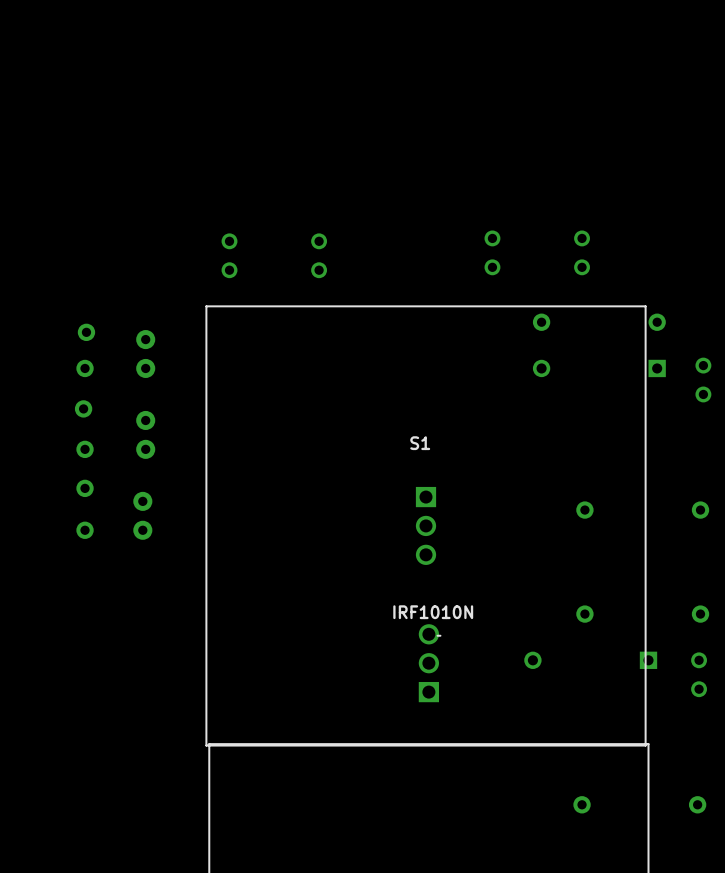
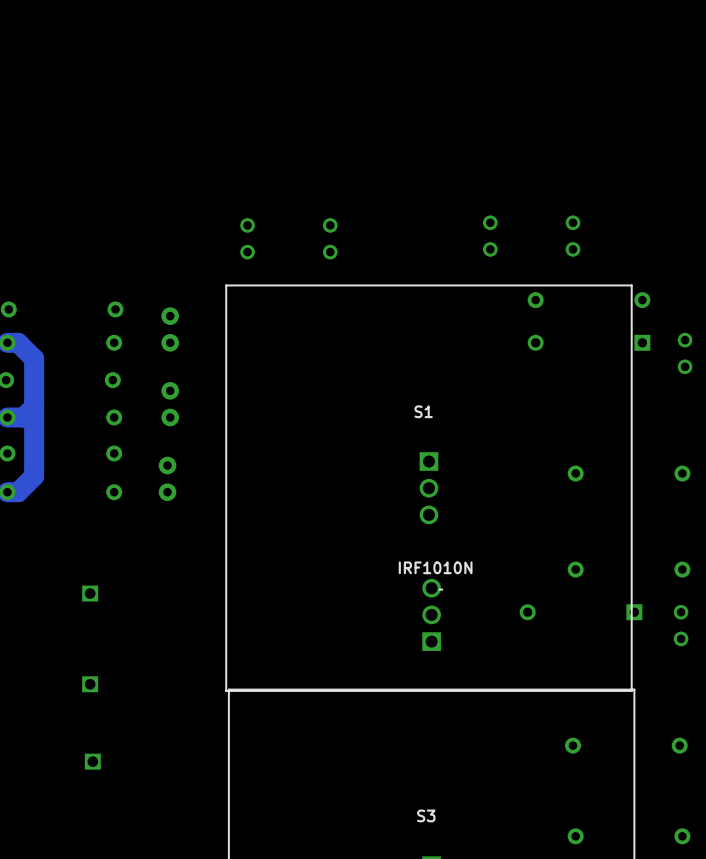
part: none -> (90, 593)
part: none -> (90, 684)
part: none -> (92, 761)

